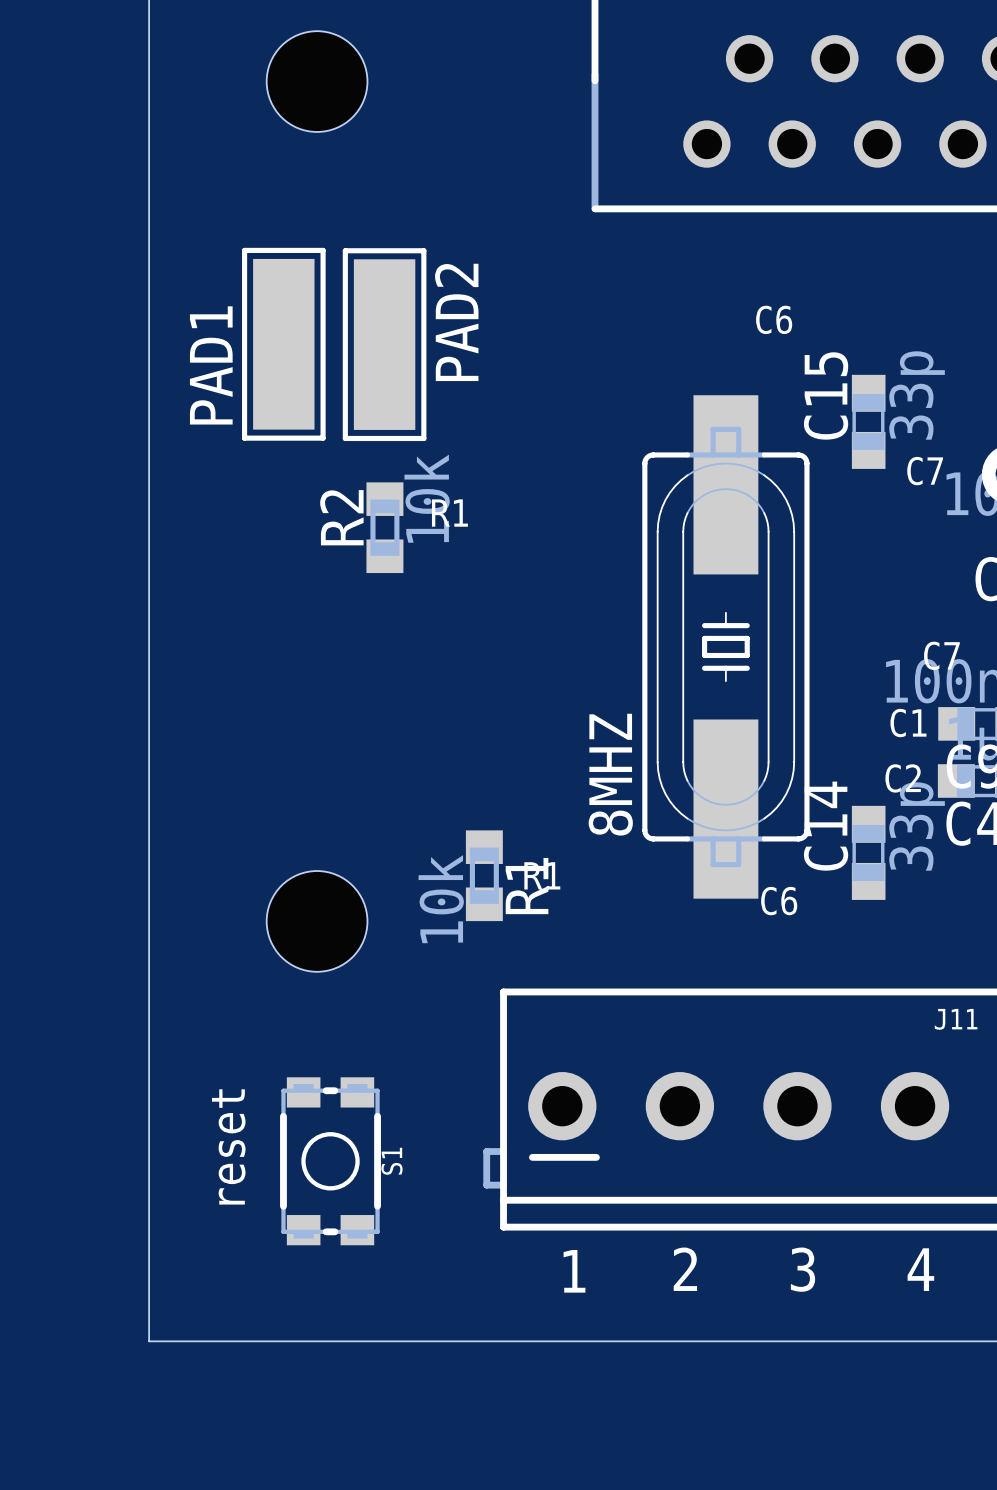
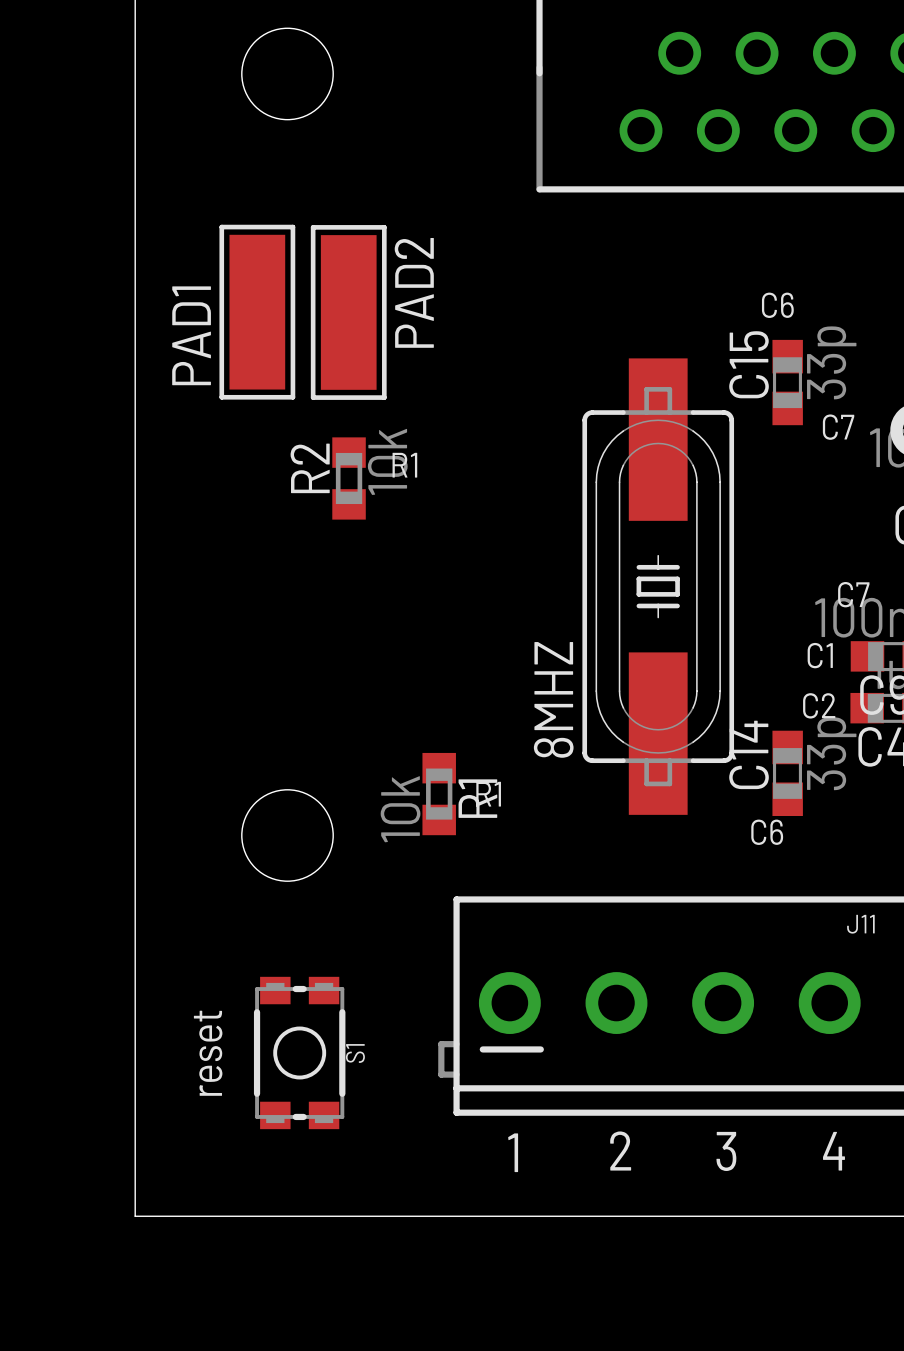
text position: C6 (774, 319) -> C6 (777, 305)
text position: C6 (779, 901) -> C6 (767, 832)

